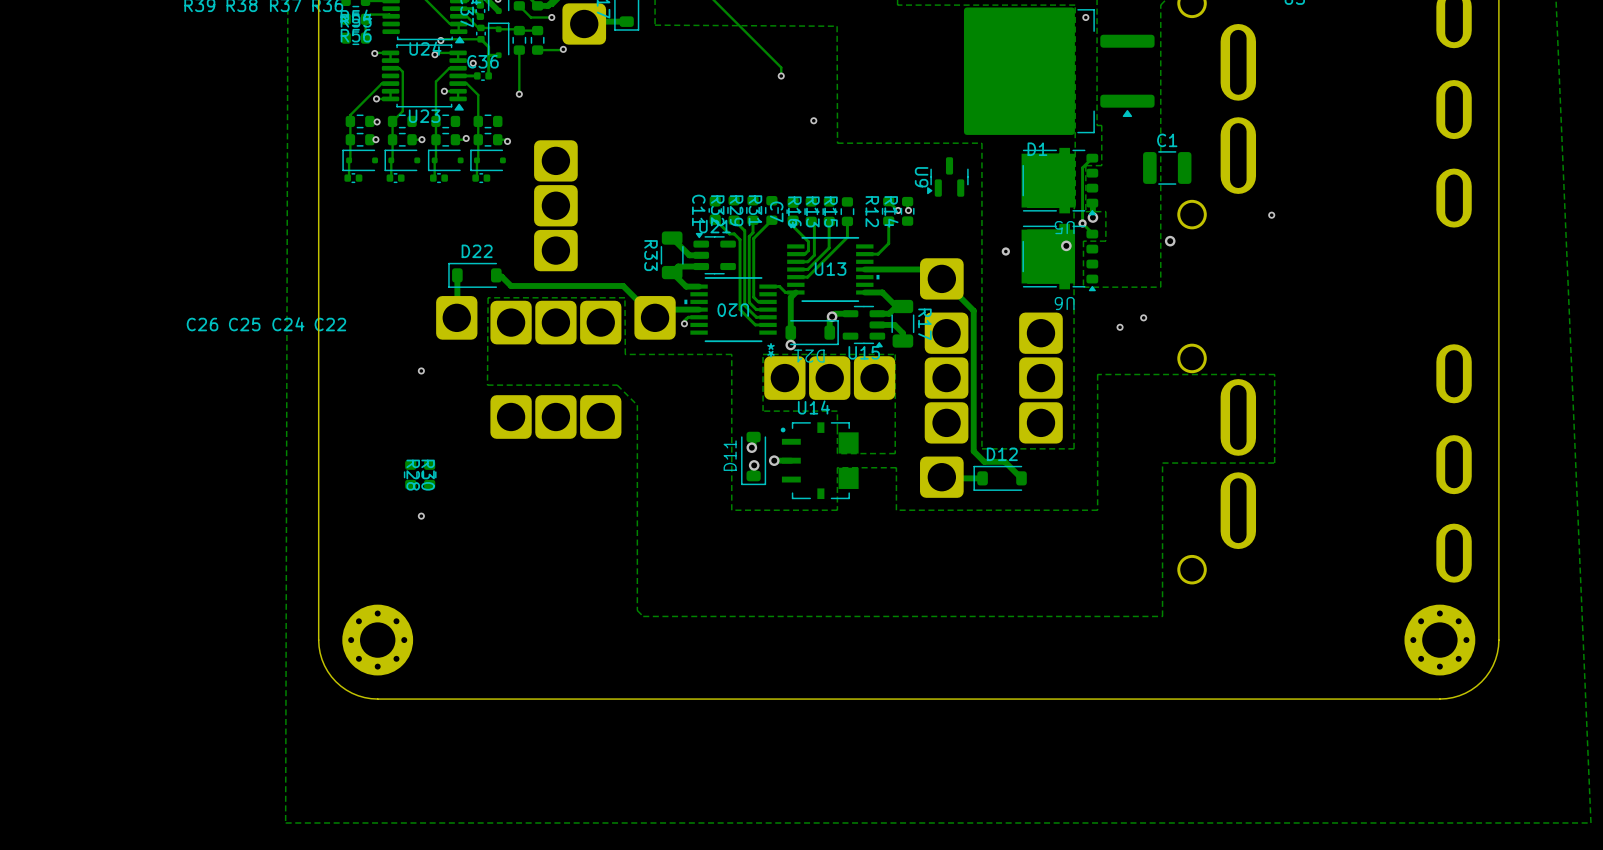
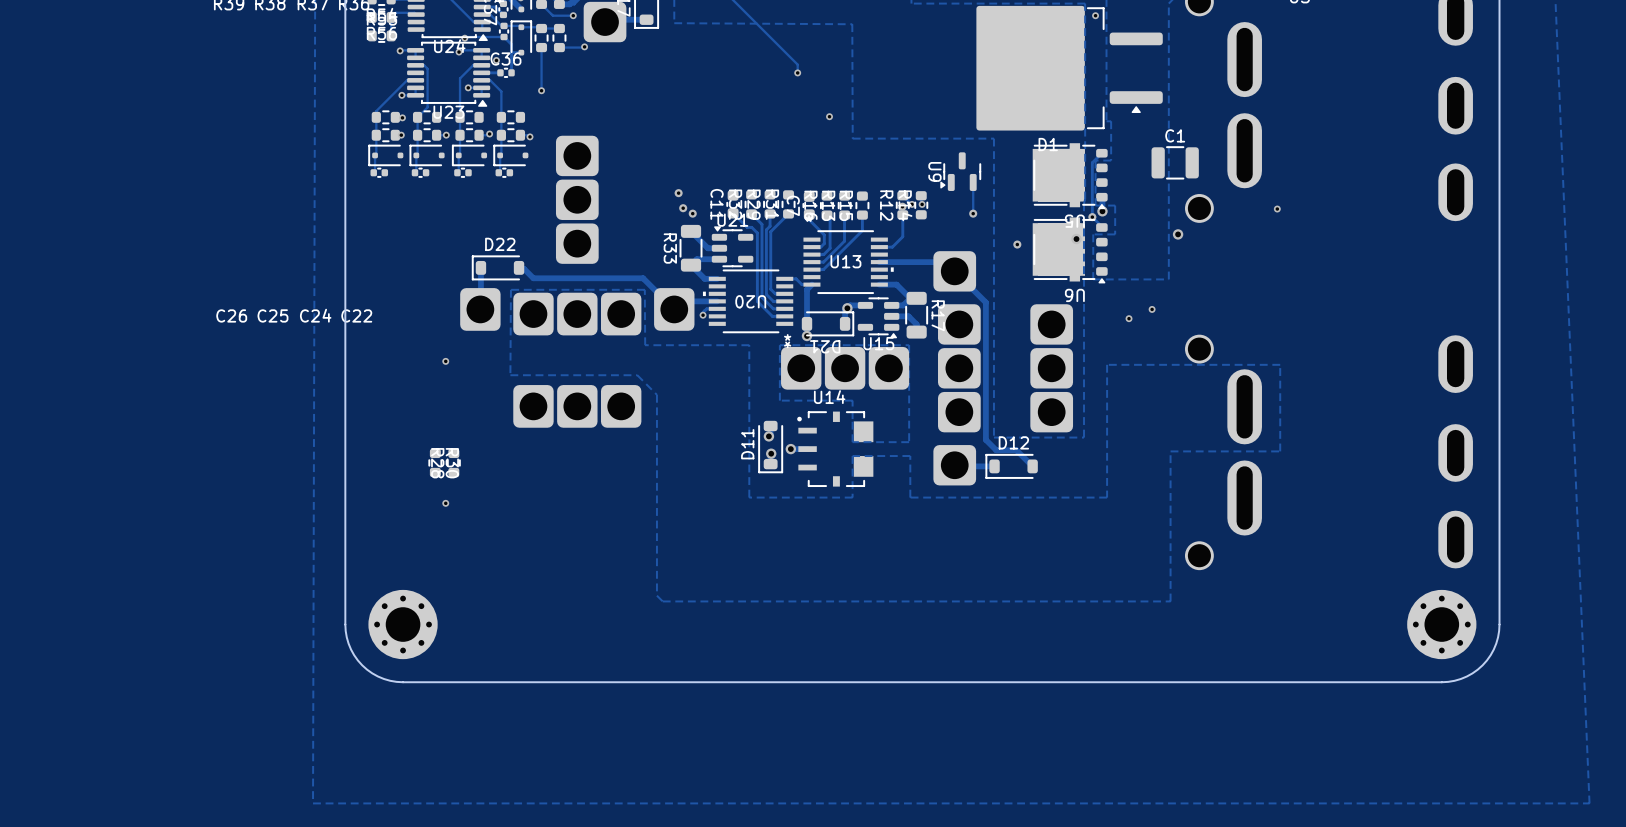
track: none -> (973, 182) (973, 213)
via: none -> (678, 193)
via: none -> (902, 206)
via: none -> (683, 208)
via: none -> (692, 213)
via: none -> (973, 213)

